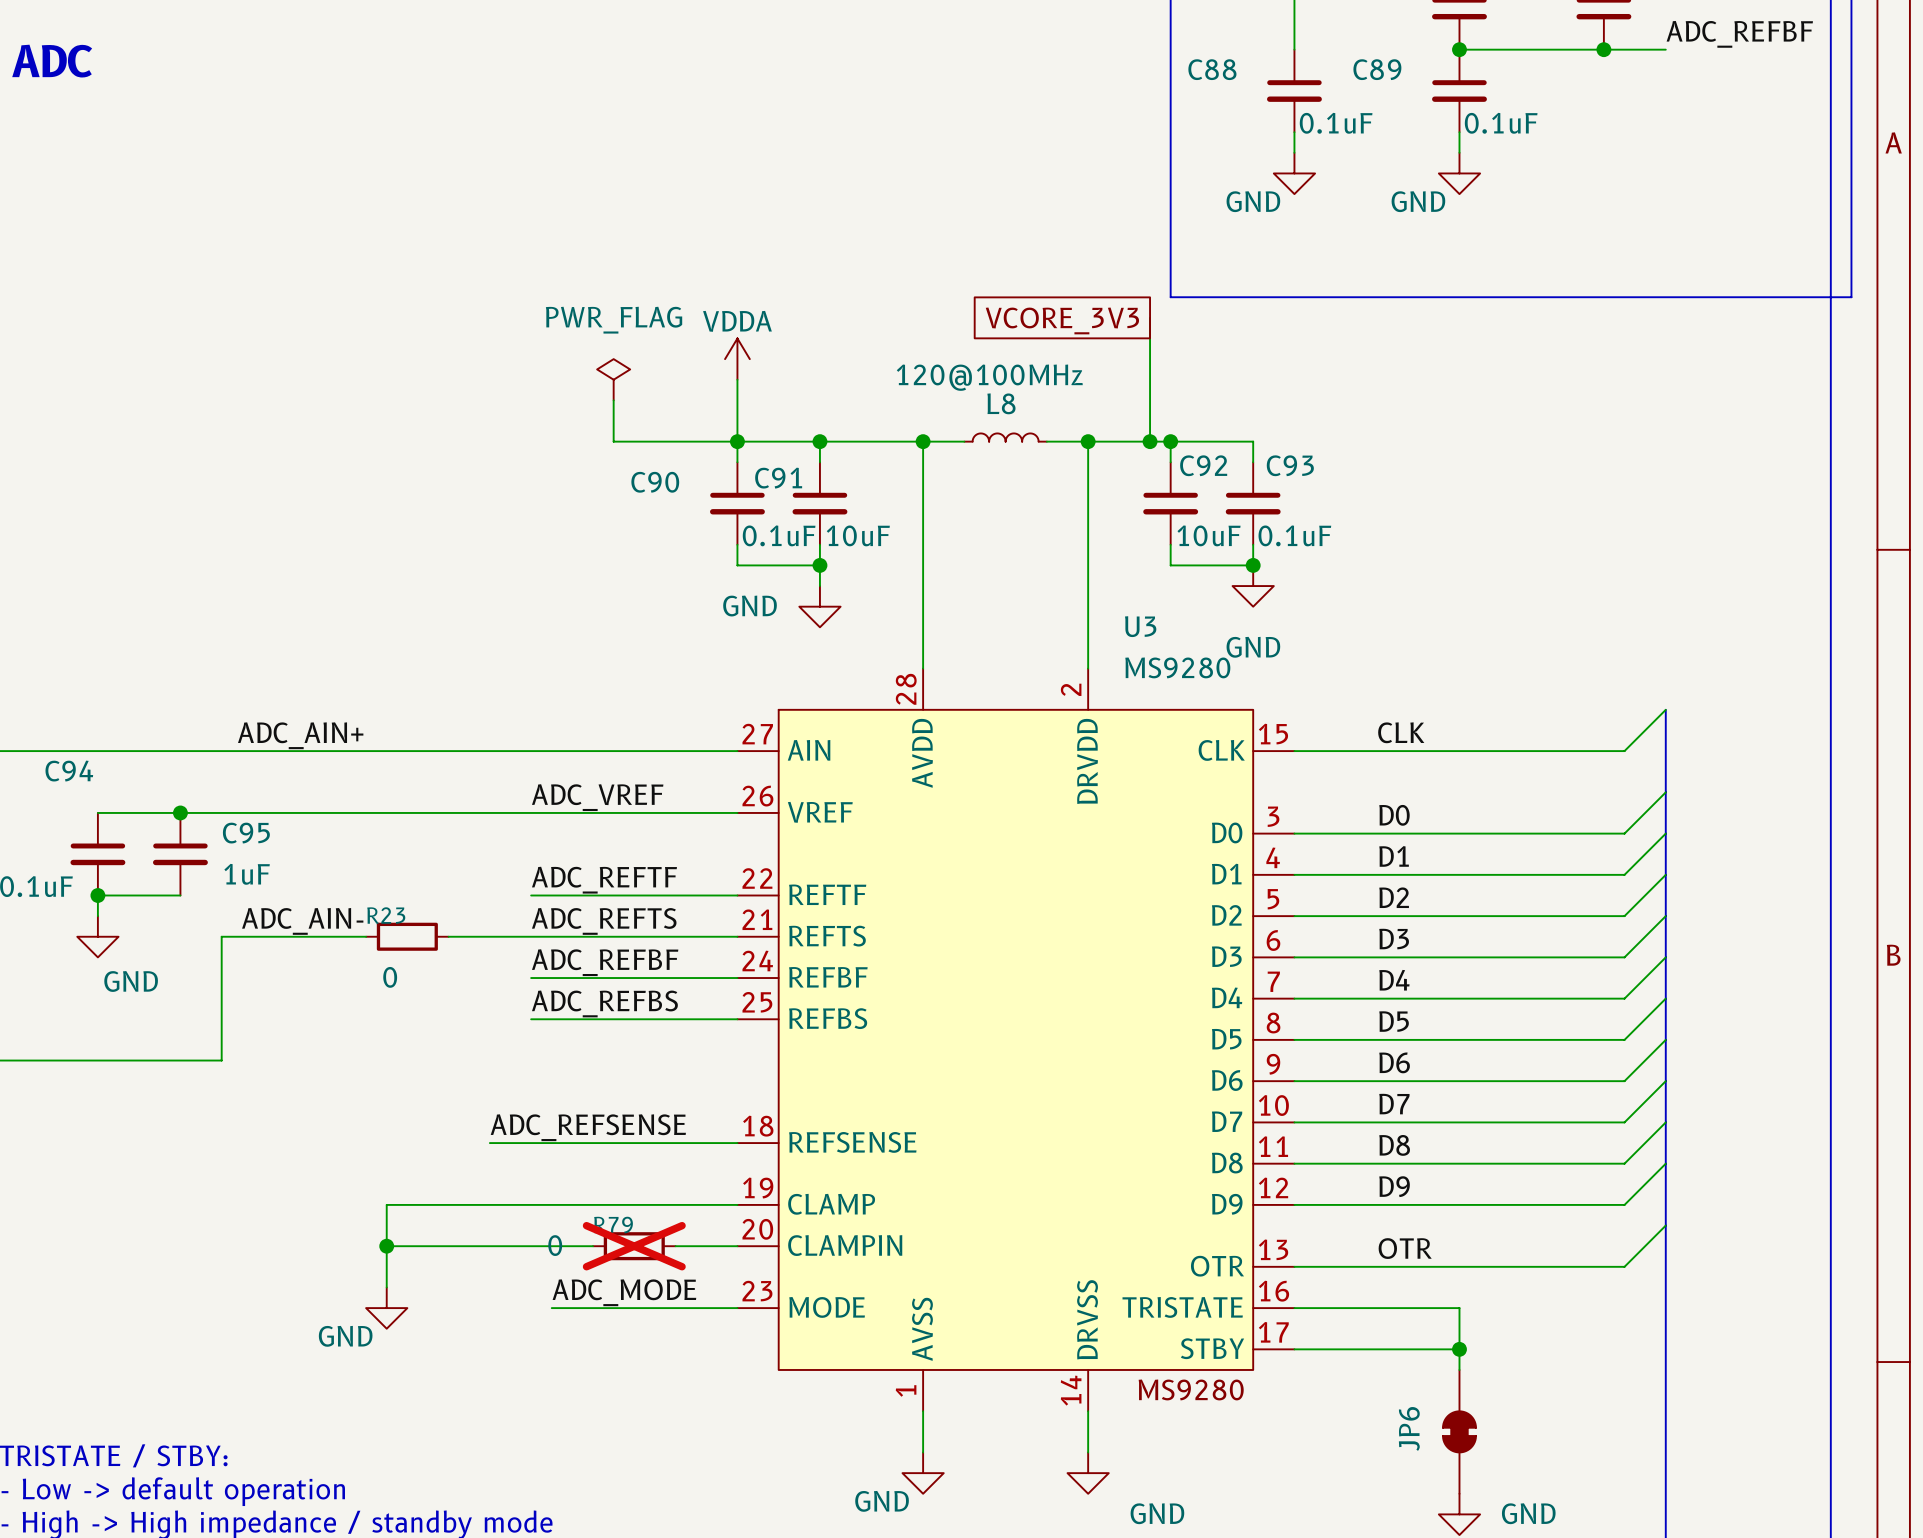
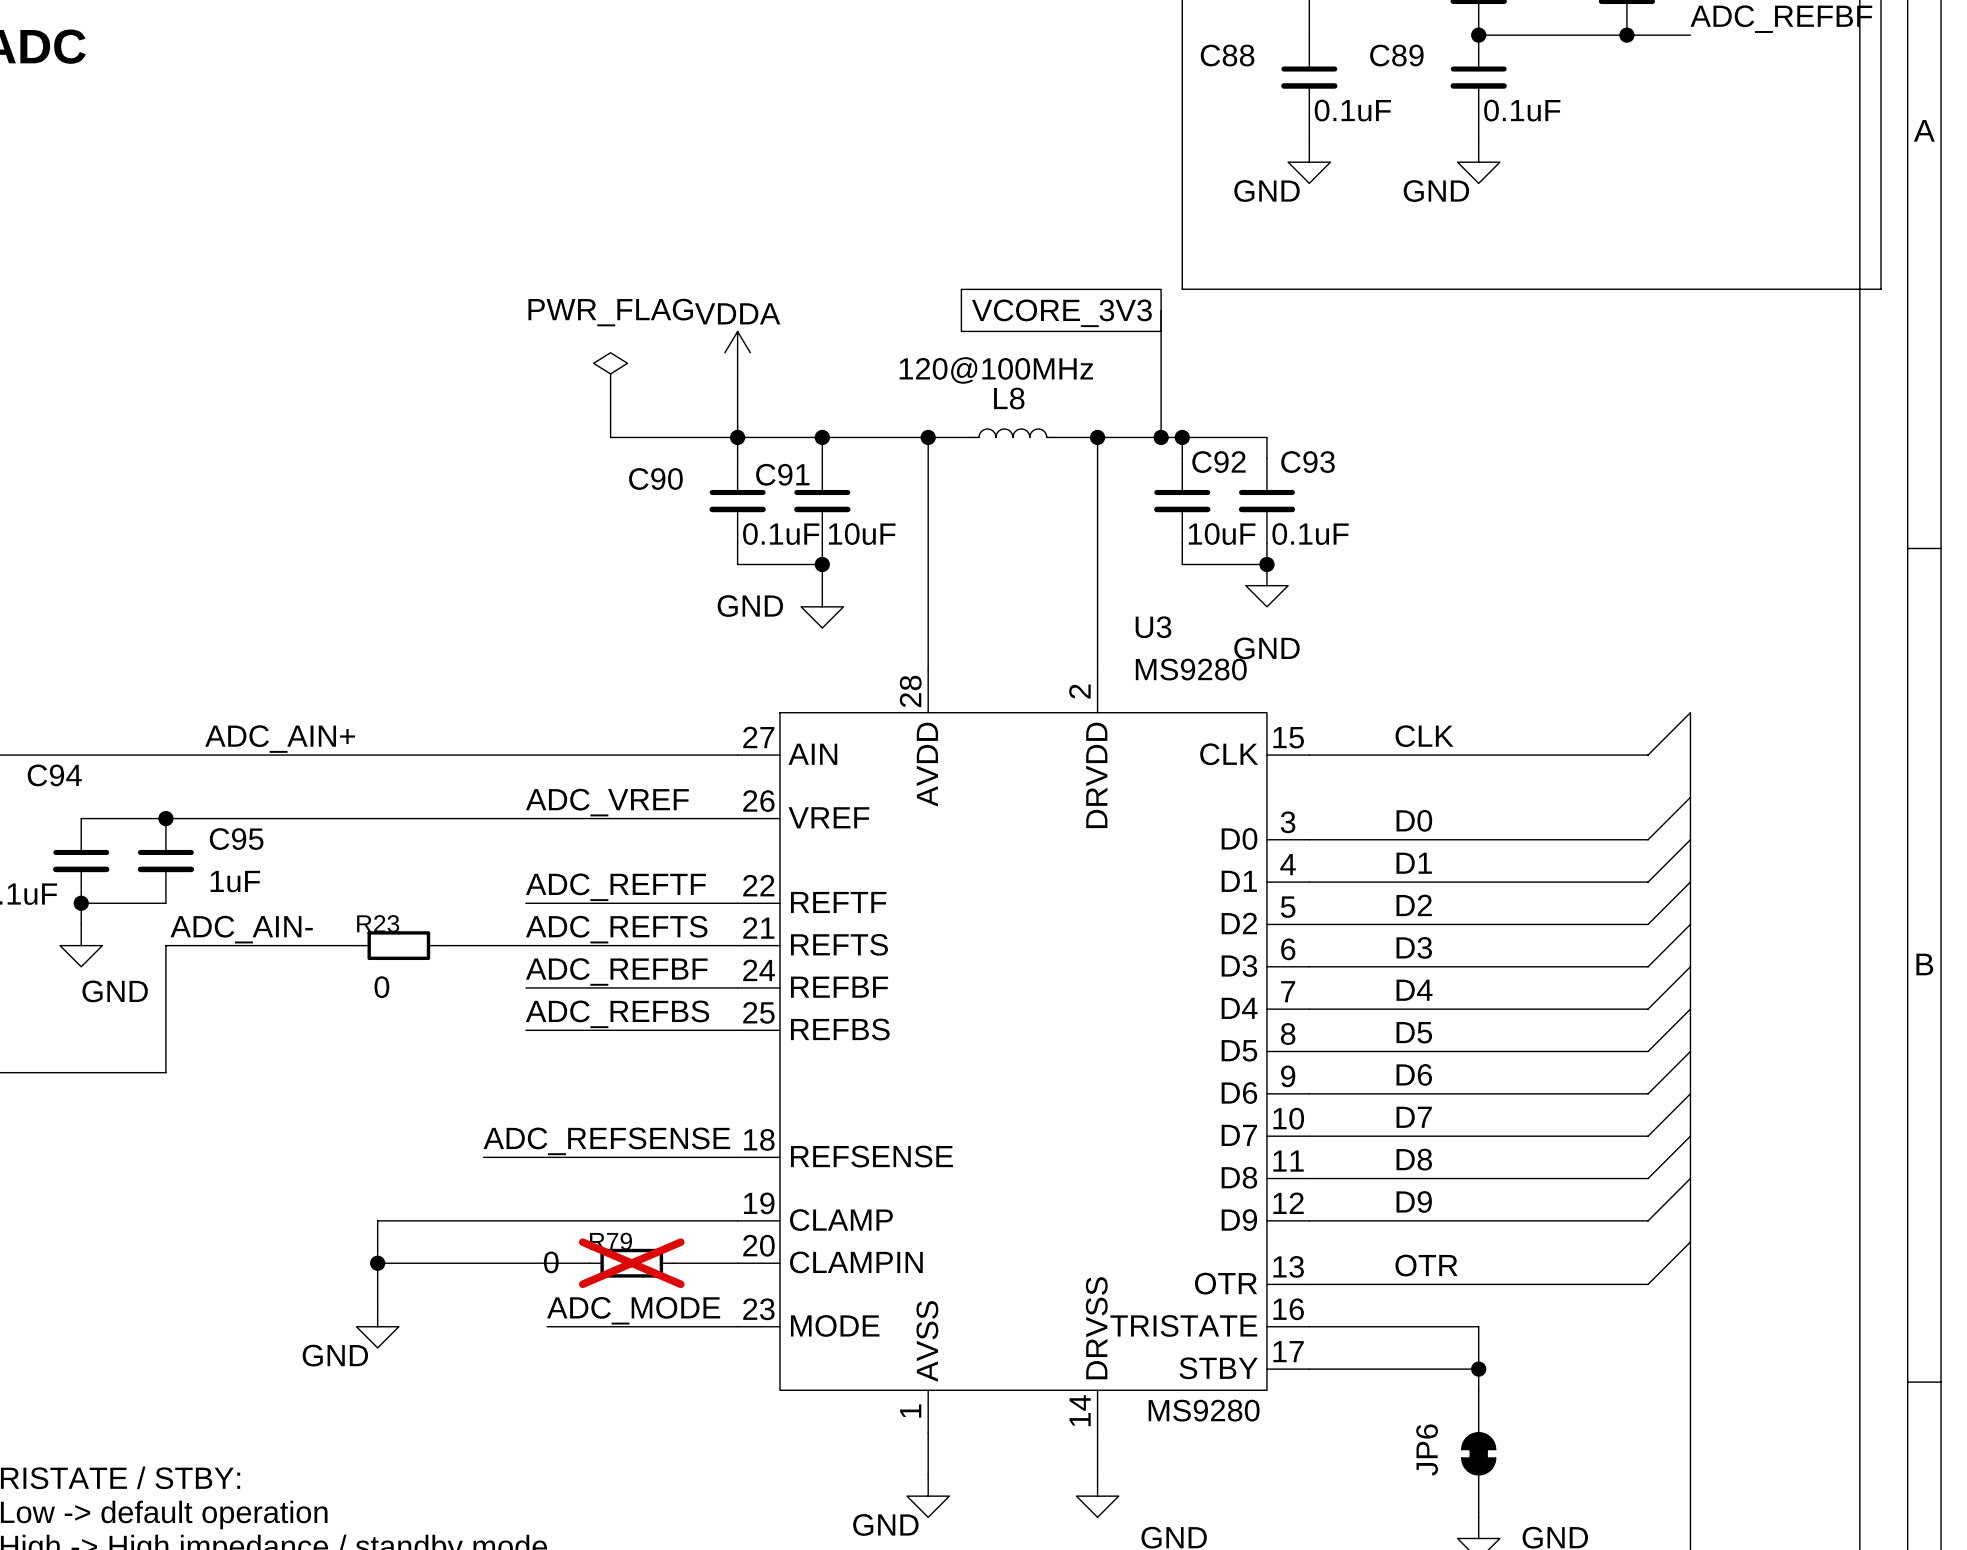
label position: ADC_AIN- (302, 921) -> ADC_AIN- (241, 929)
wire: (221, 936) (221, 1060) (180, 1060) -> (208, 945) (165, 945) (165, 1072)

